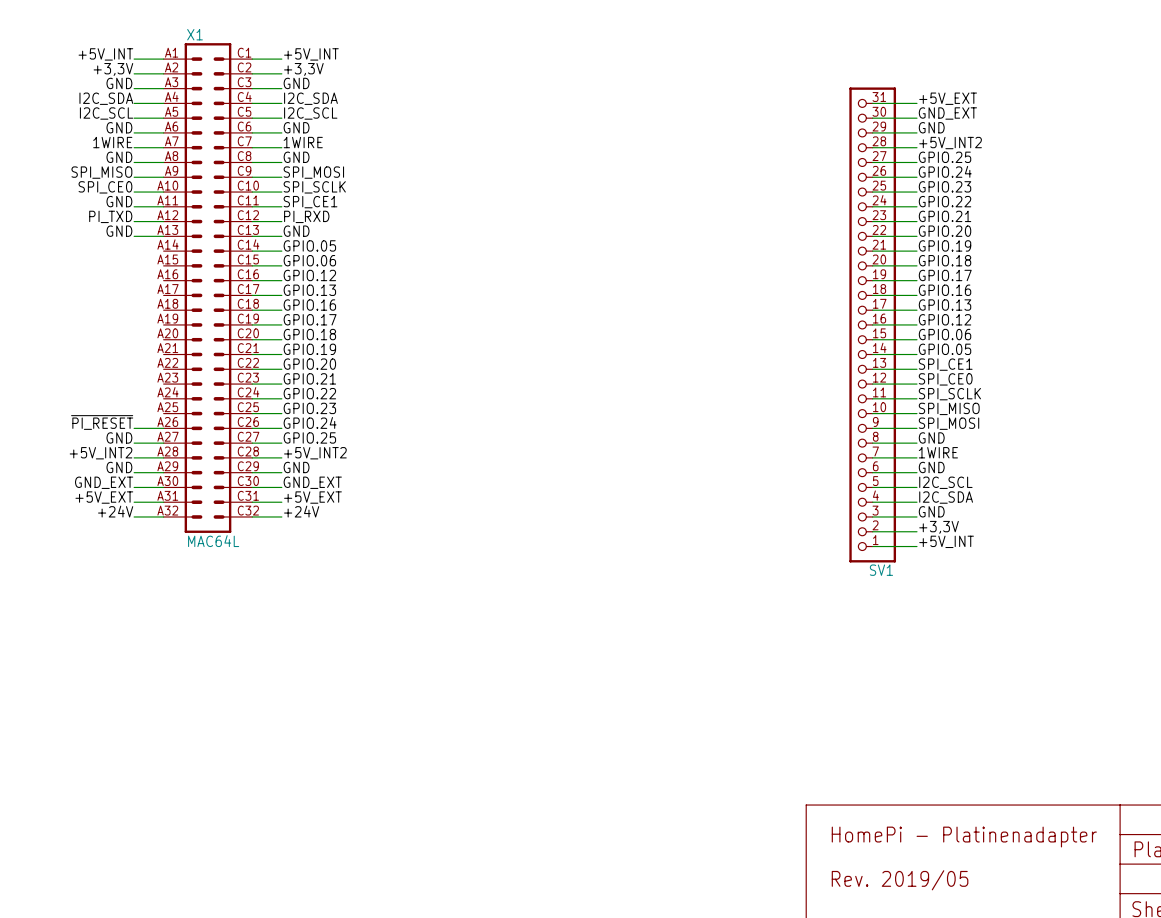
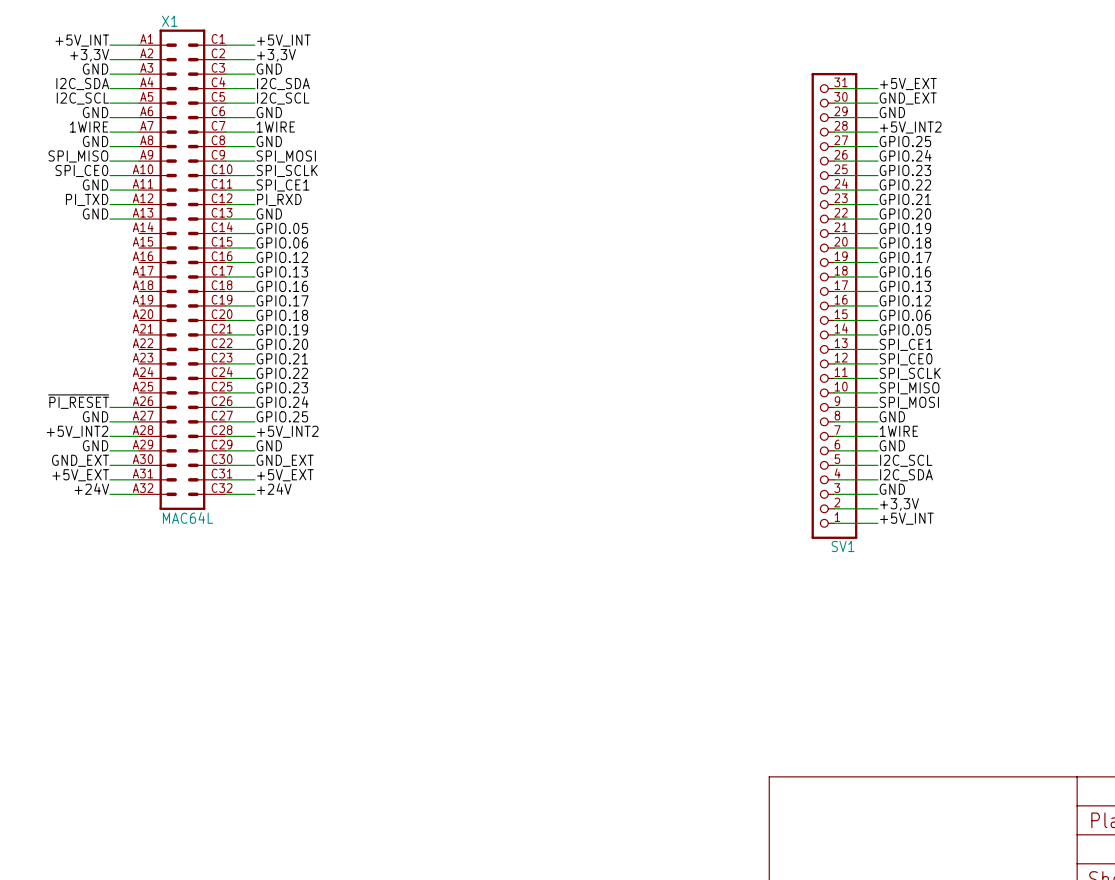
text: HomePi - Platinenadapter (964, 837) -> none
text: Rev. 2019/05 (900, 880) -> none

